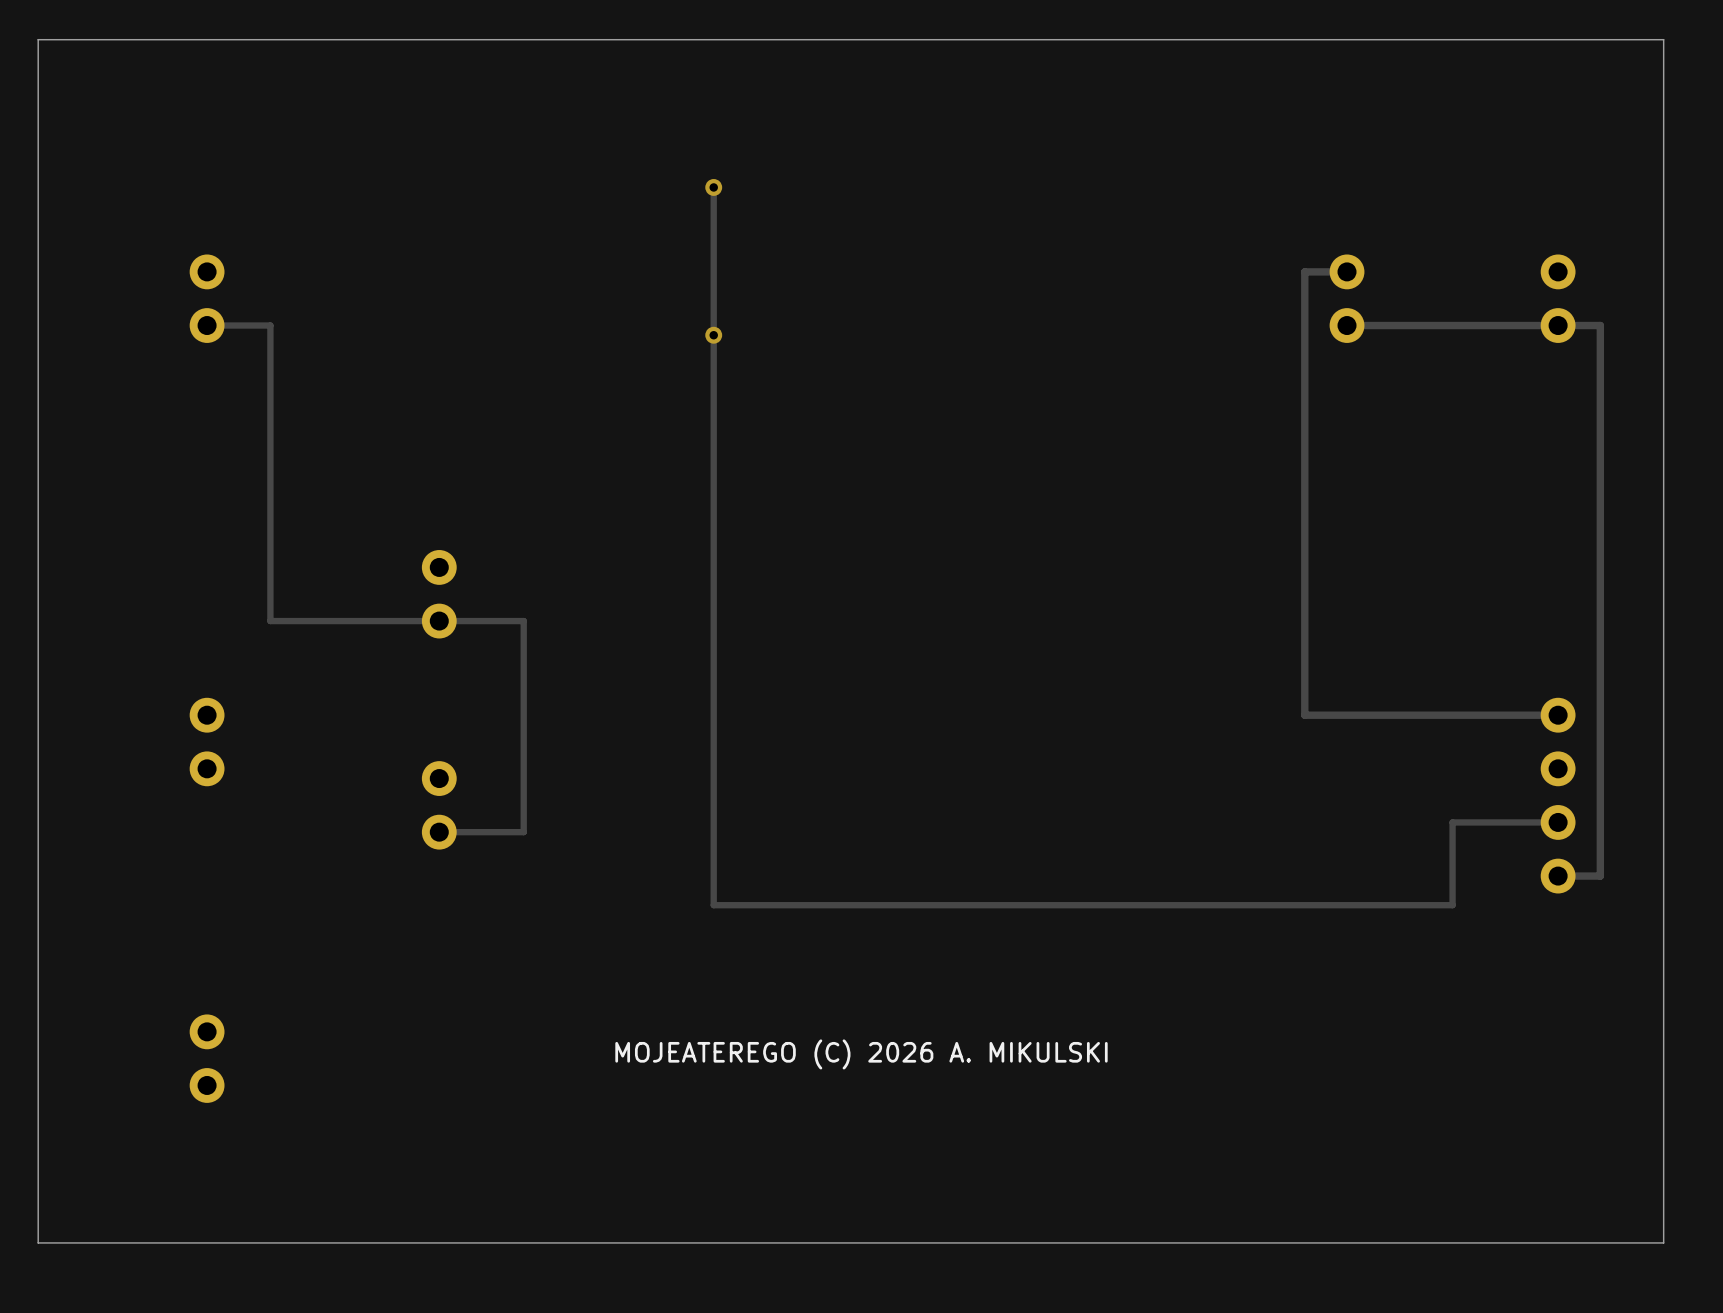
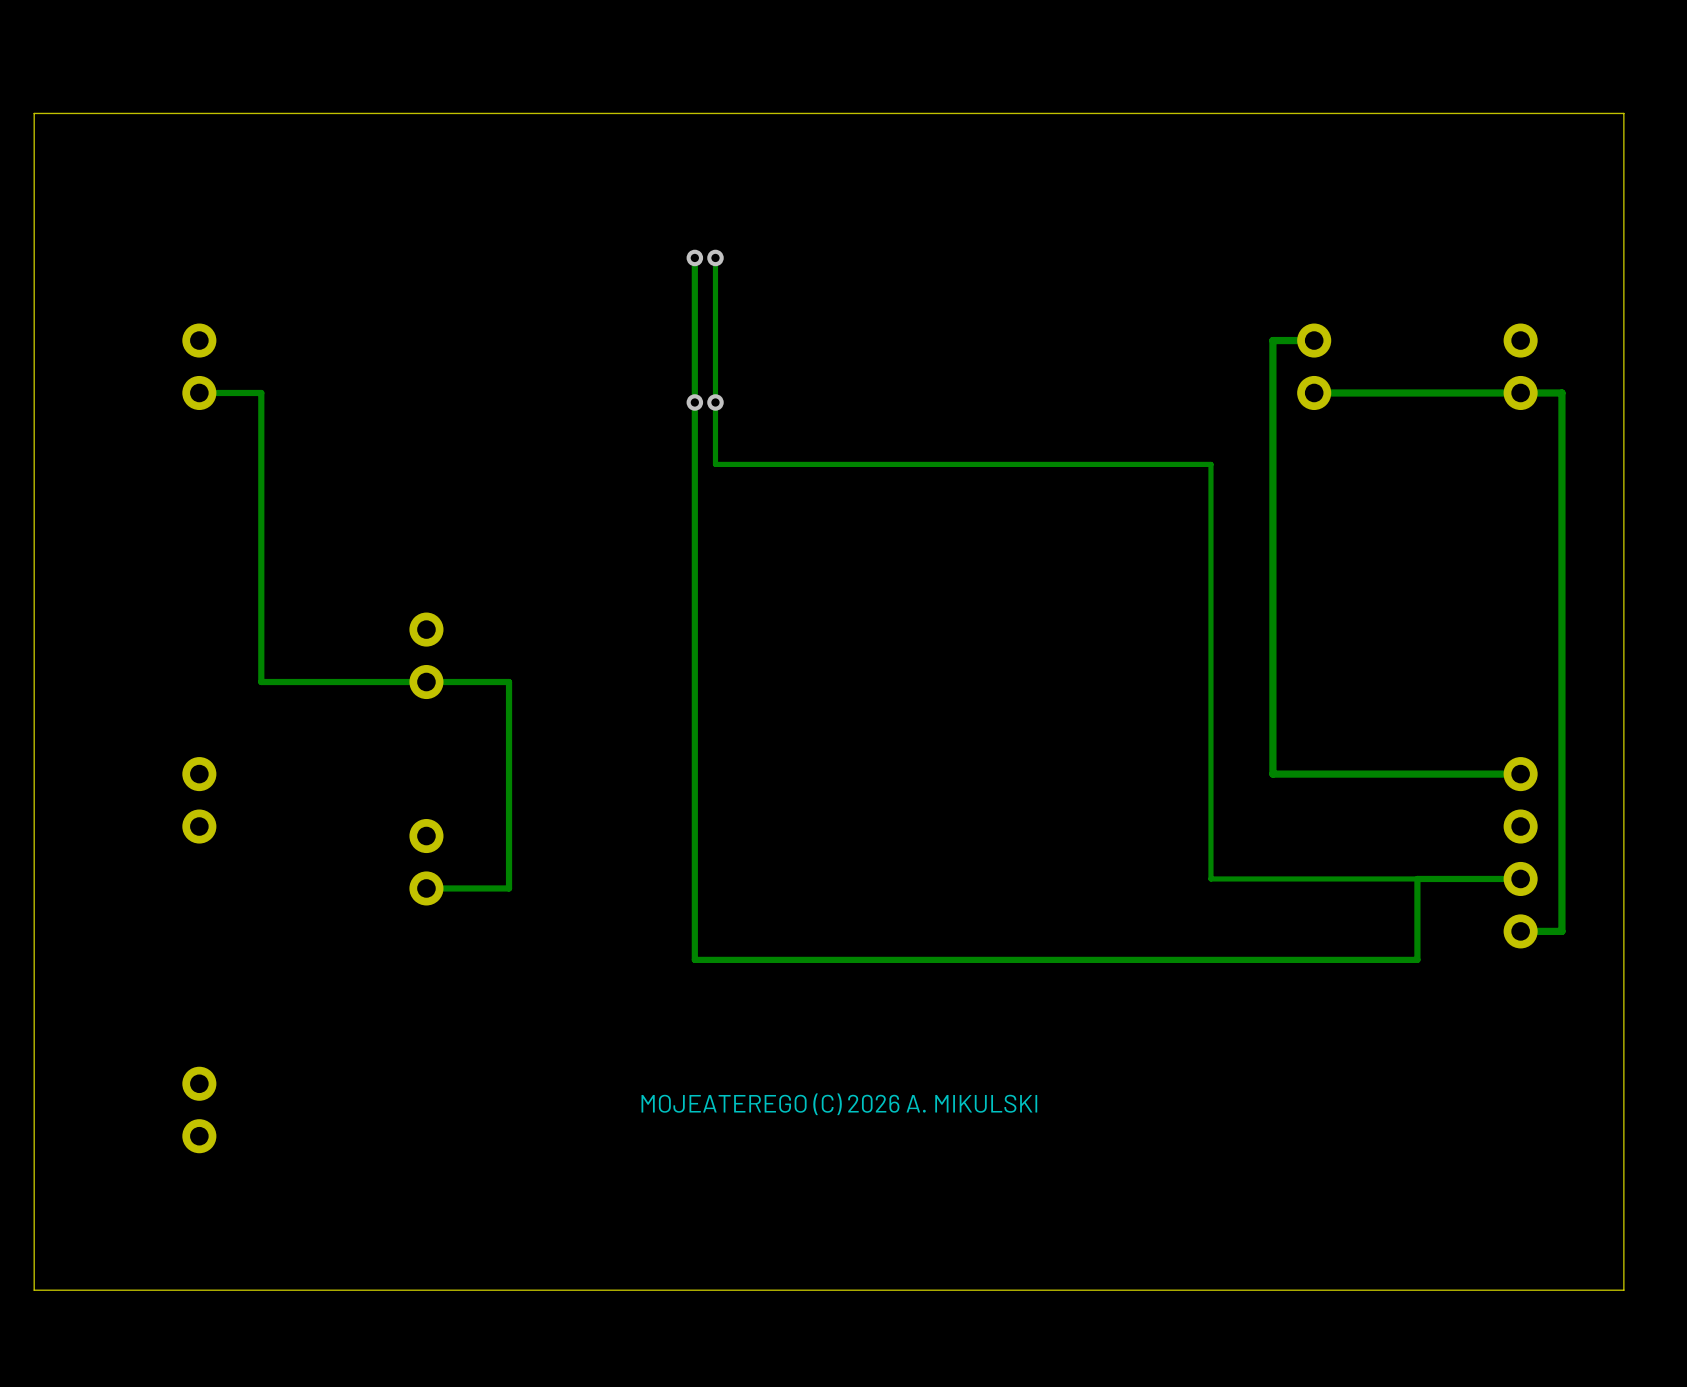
track: none -> (715, 257) (715, 464) (1210, 464) (1210, 878) (1520, 878)
via: none -> (715, 257)
via: none -> (715, 402)

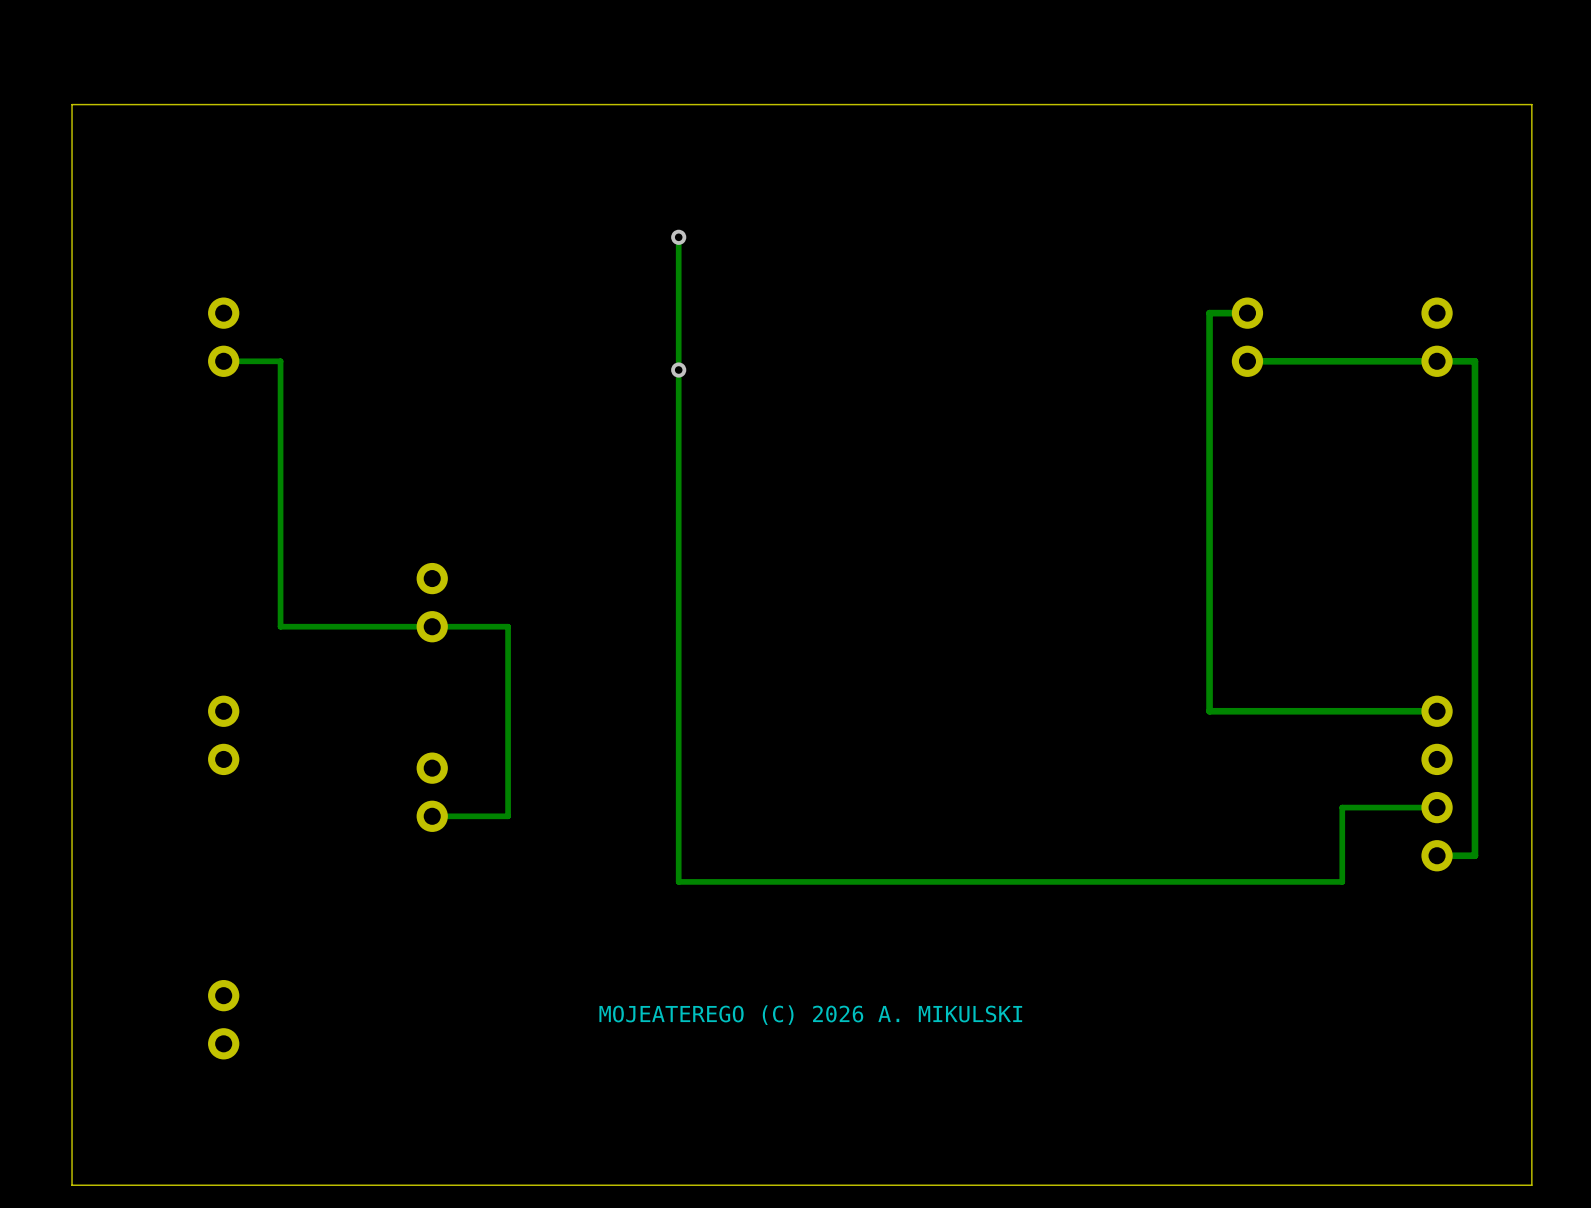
track: (715, 257) (715, 464) (1210, 464) (1210, 878) (1520, 878) -> none
via: (715, 257) -> none
via: (715, 402) -> none

